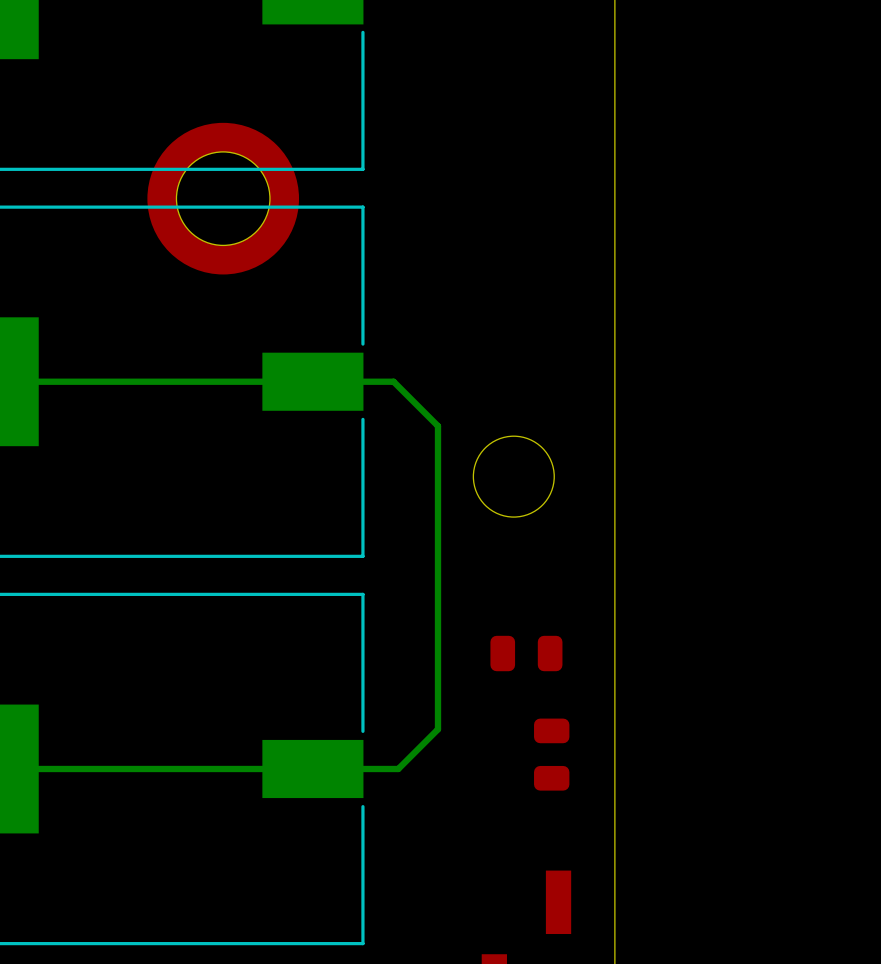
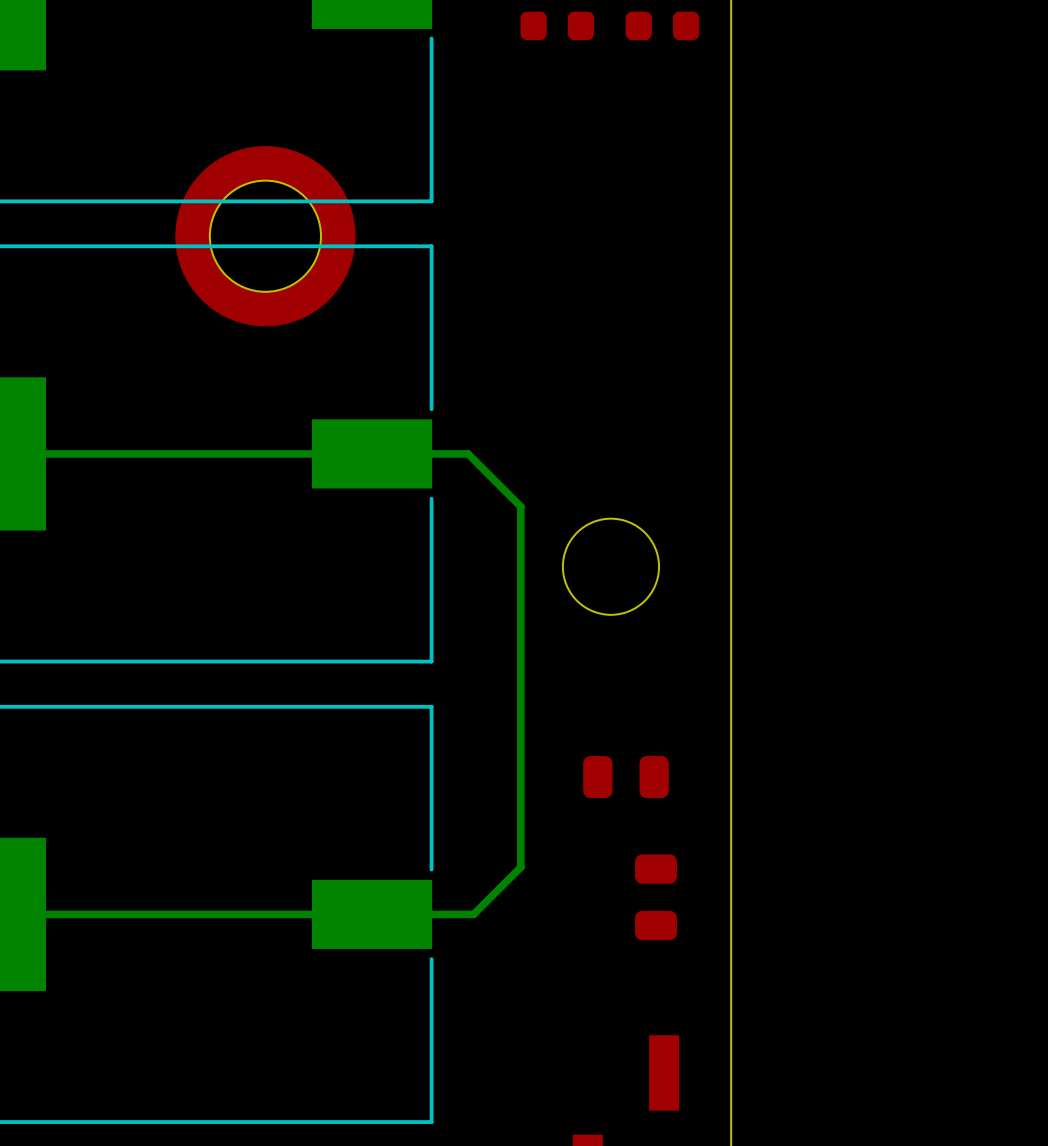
part: none -> (557, 25)
part: none -> (662, 25)

